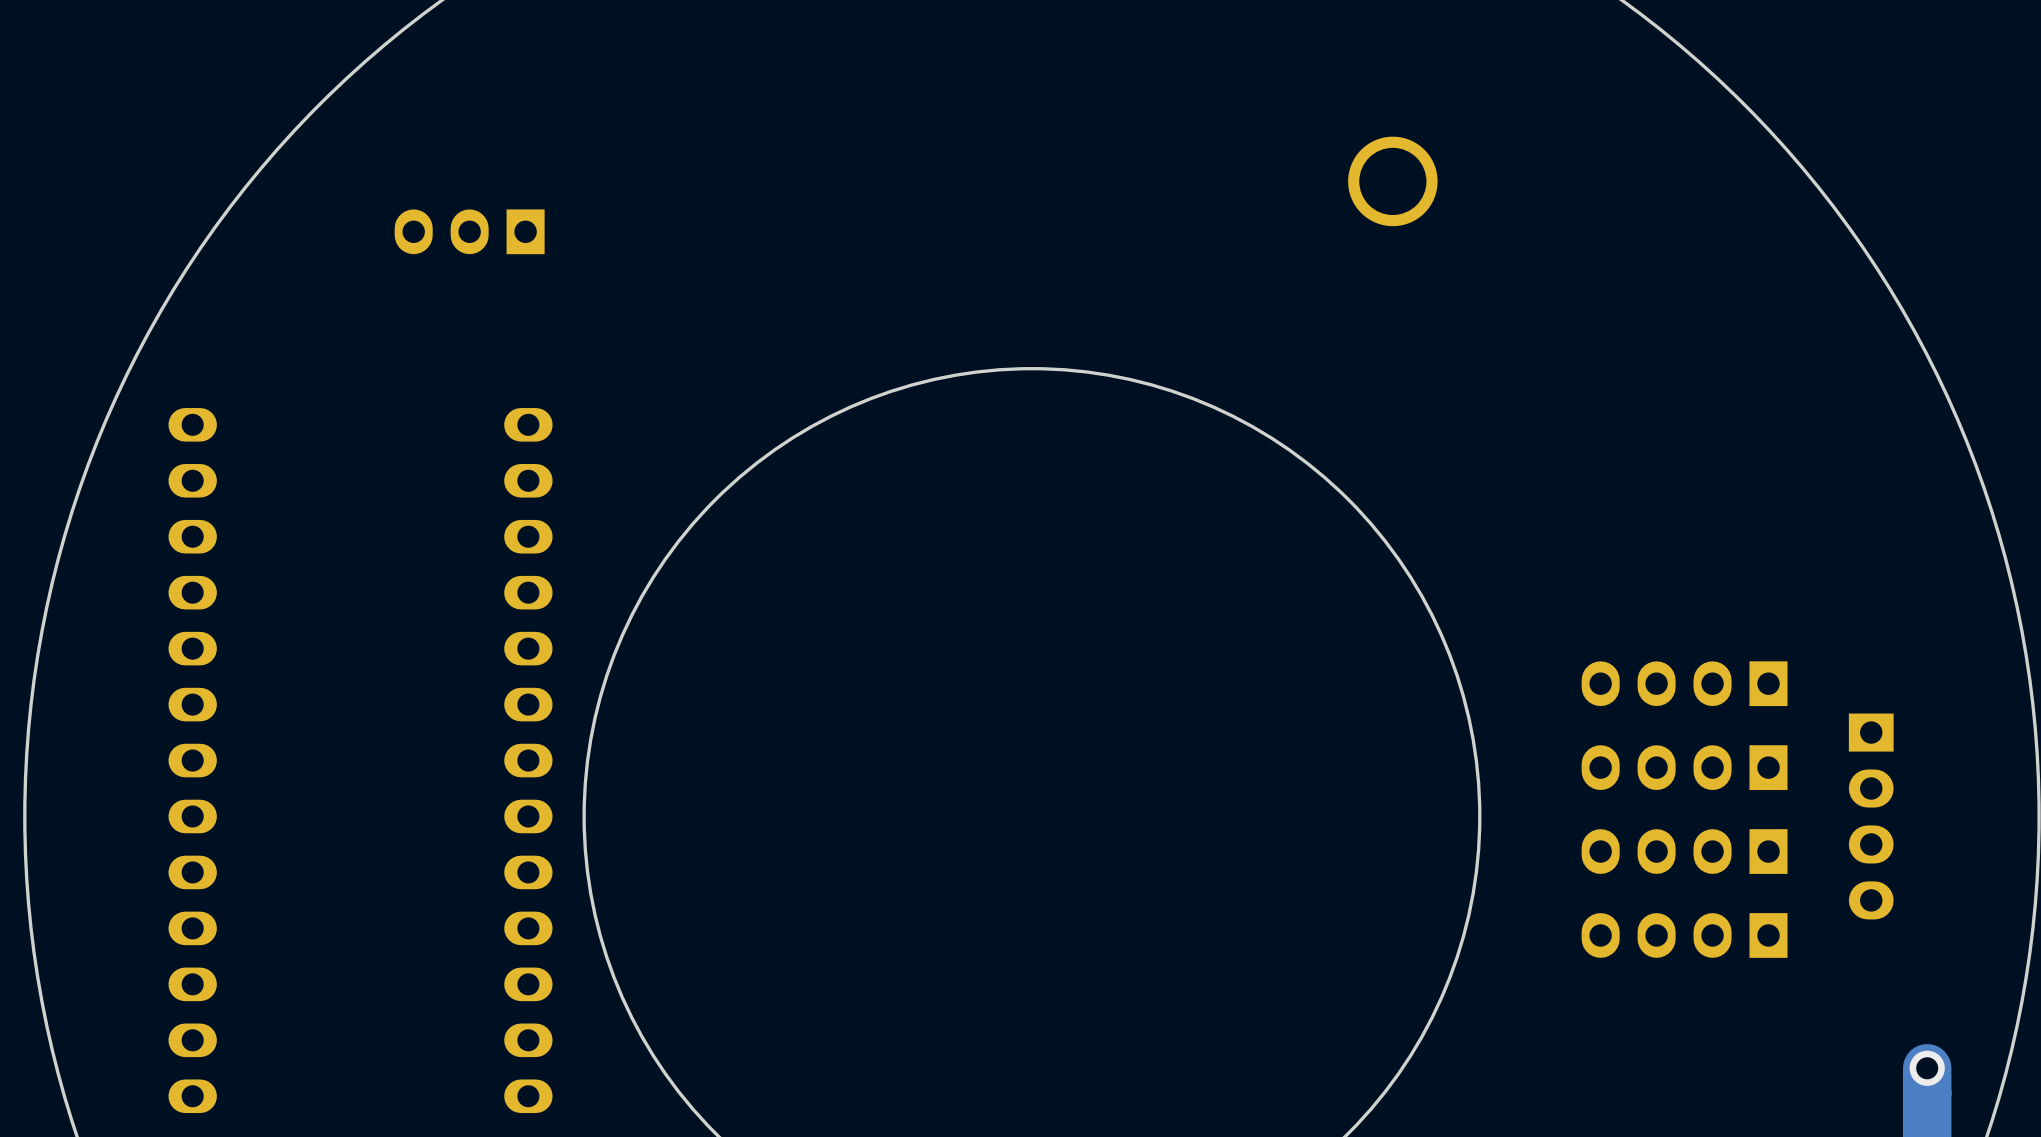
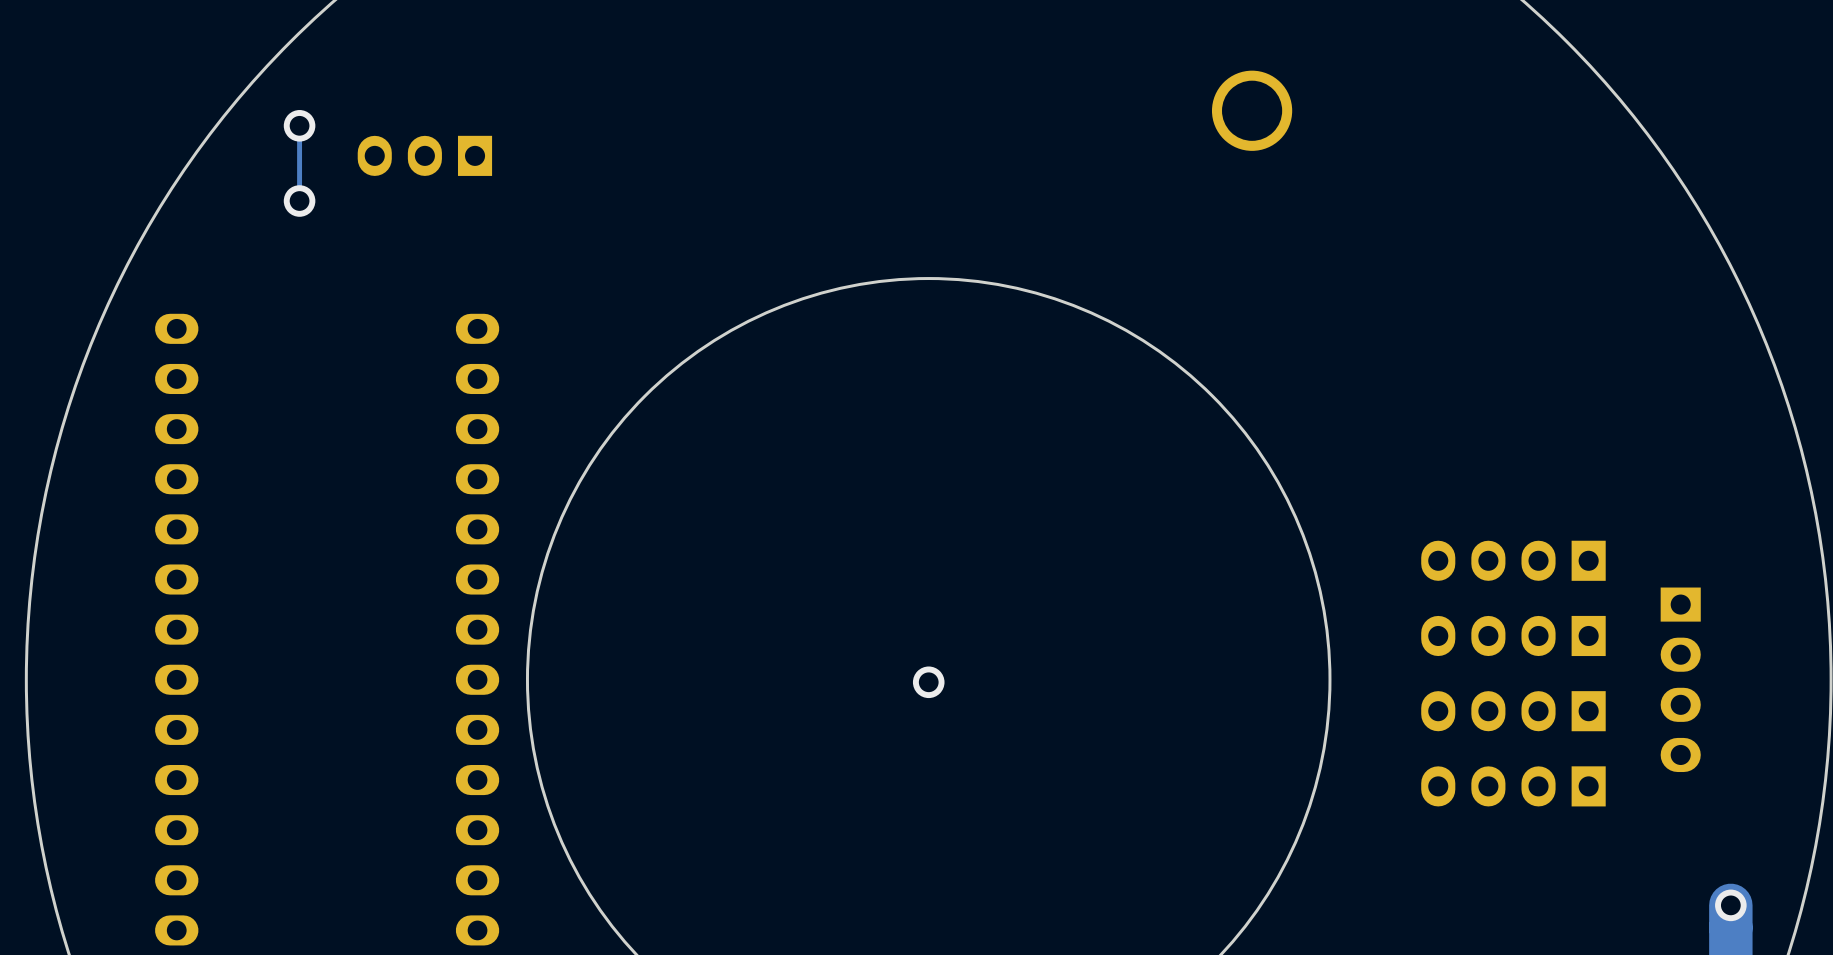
track: none -> (299, 125) (299, 201)
via: none -> (299, 125)
via: none -> (299, 201)
via: none -> (928, 682)

